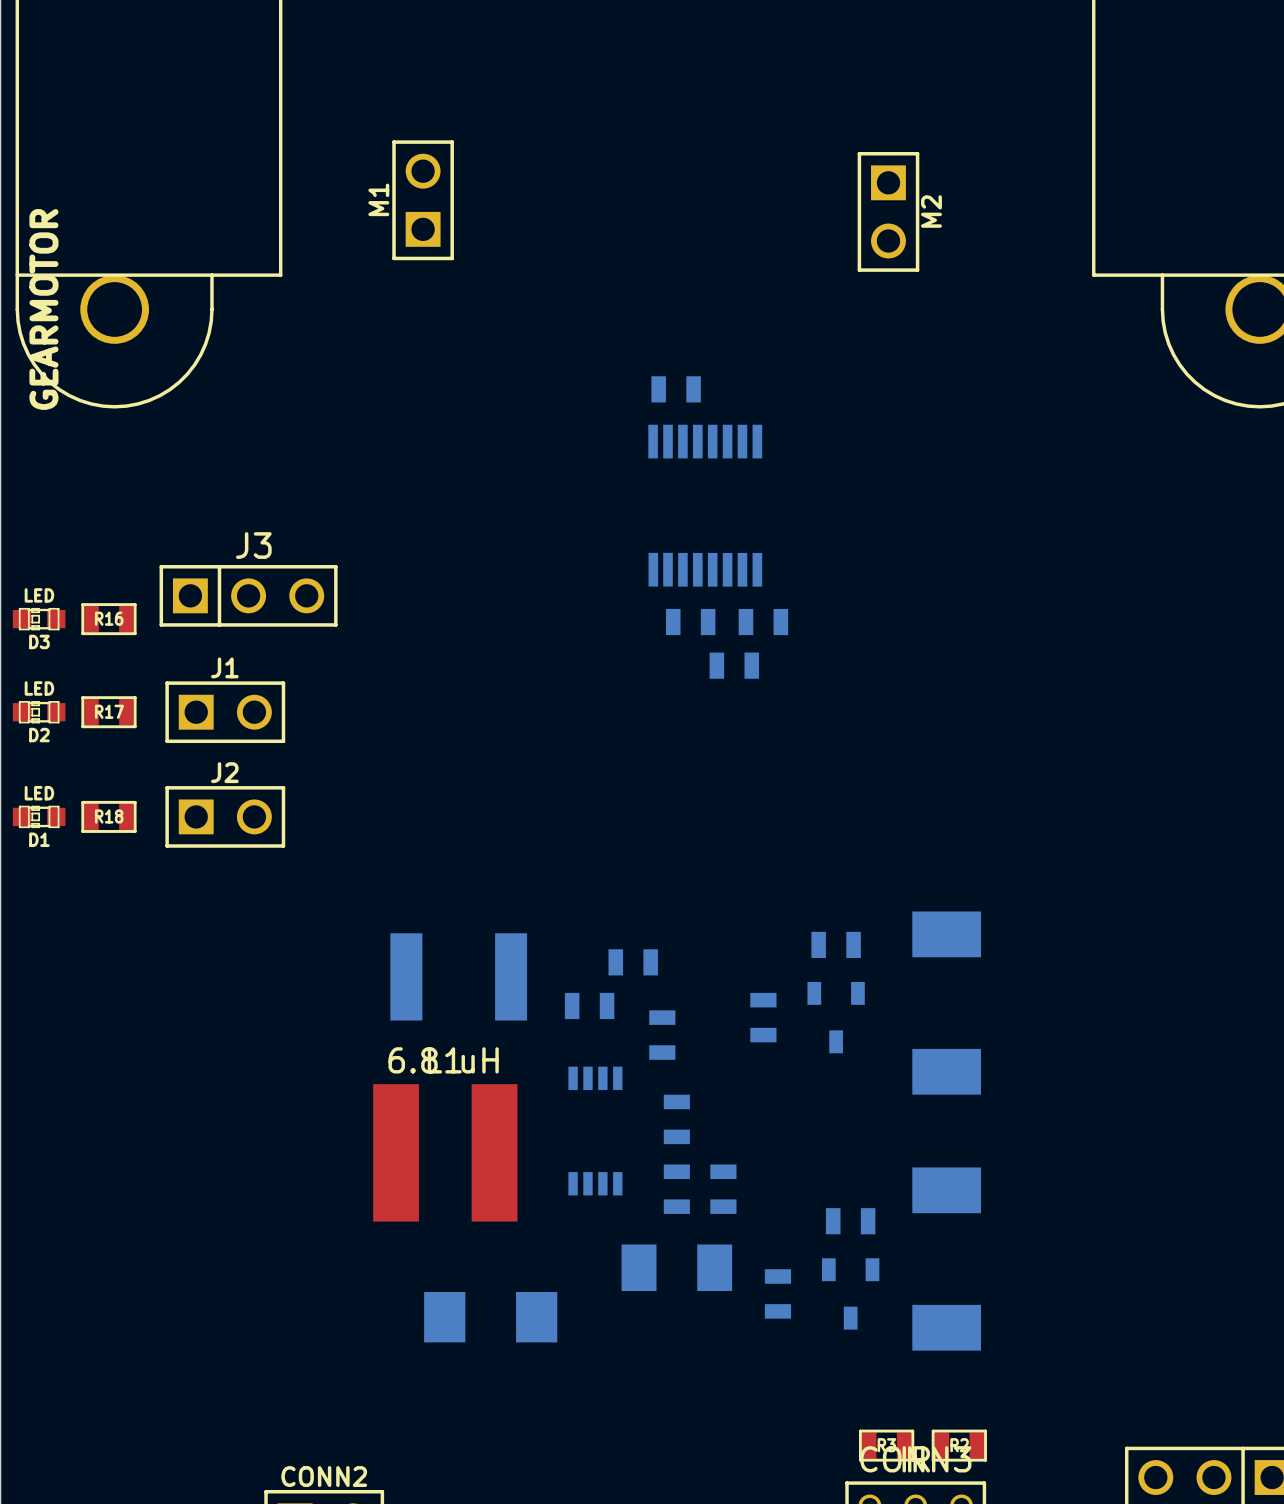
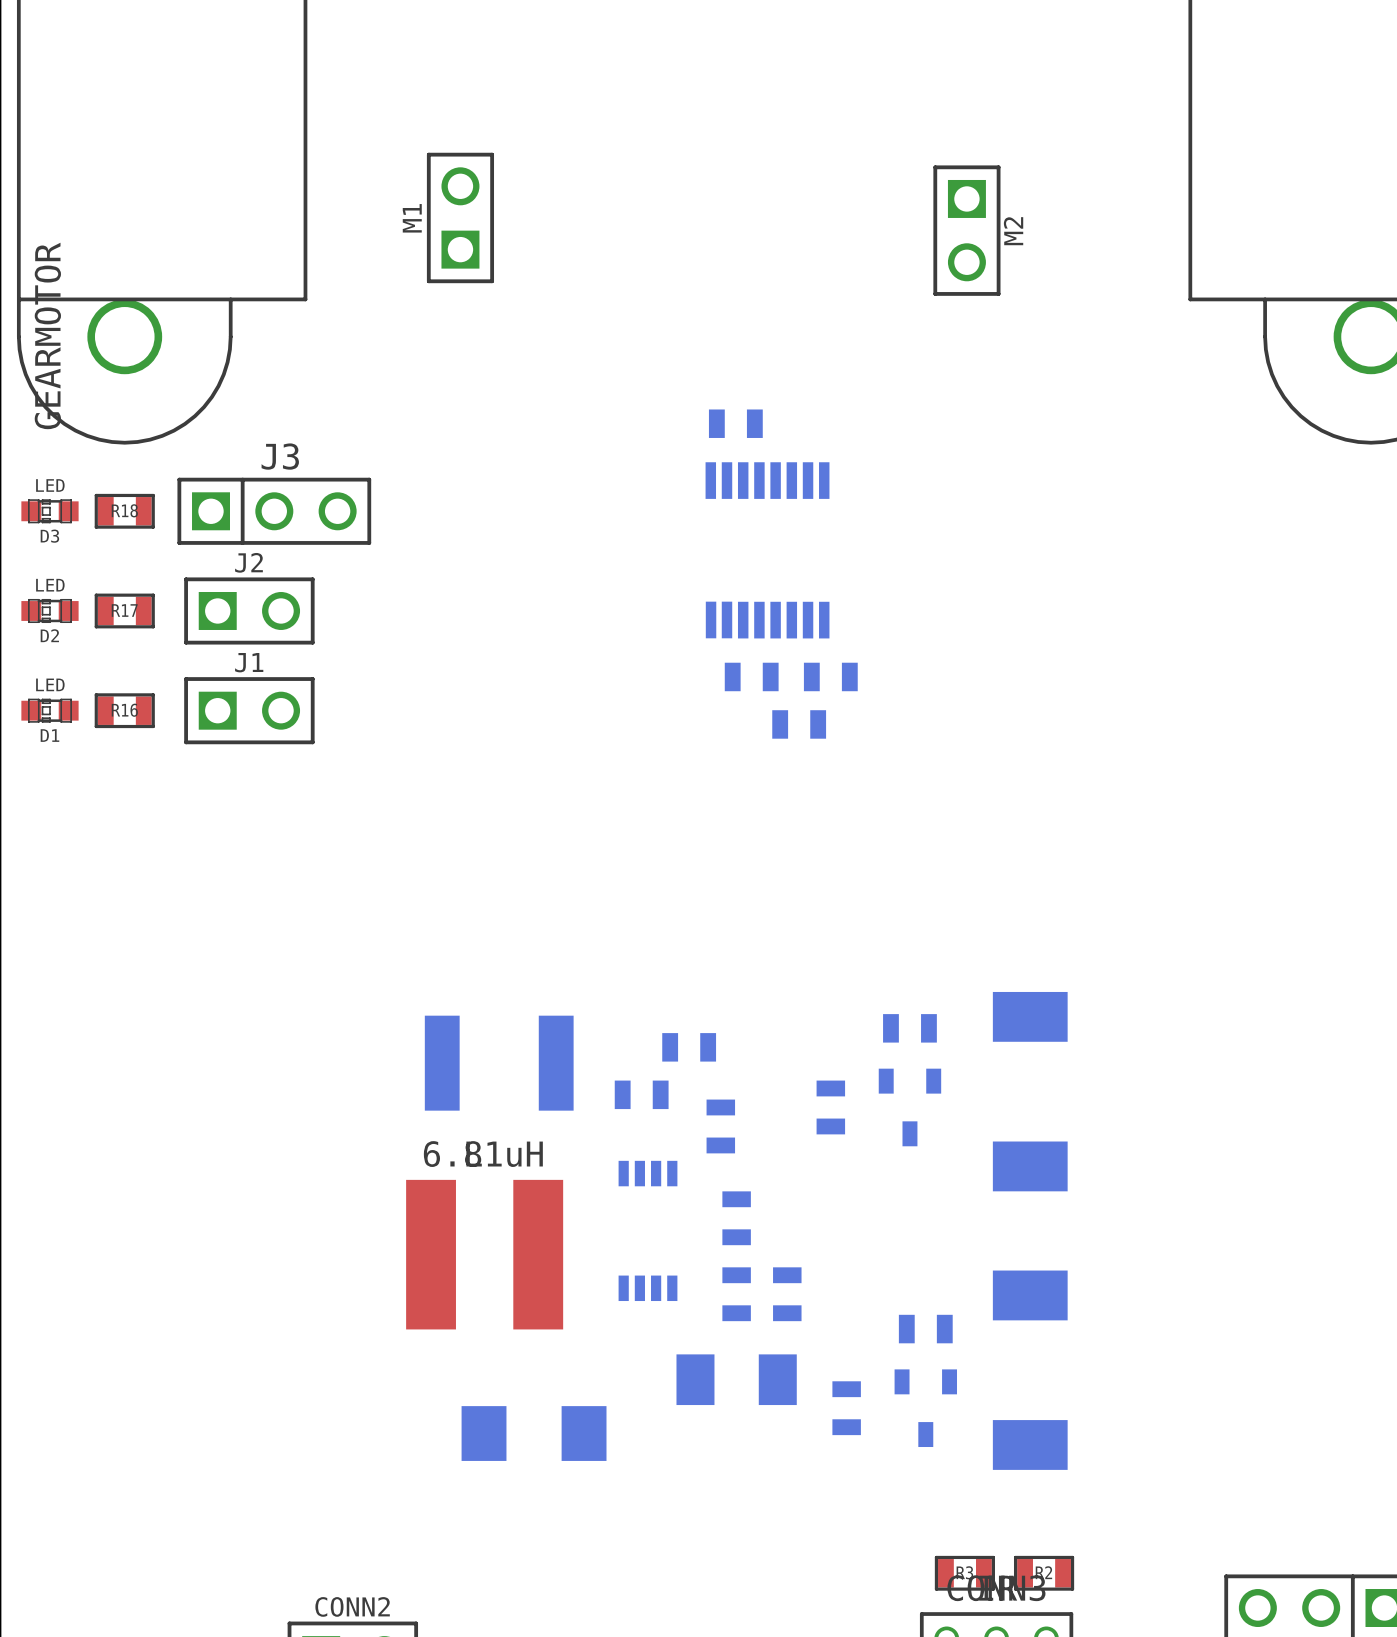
J3 position: (248, 595) -> (274, 511)
D3 position: (39, 619) -> (49, 511)
R16 position: (108, 619) -> (124, 710)
D2 position: (39, 712) -> (49, 610)
R17 position: (108, 712) -> (124, 610)
J1 position: (225, 712) -> (249, 710)
D1 position: (39, 816) -> (49, 710)
R18 position: (108, 816) -> (124, 511)
J2 position: (225, 816) -> (249, 610)

